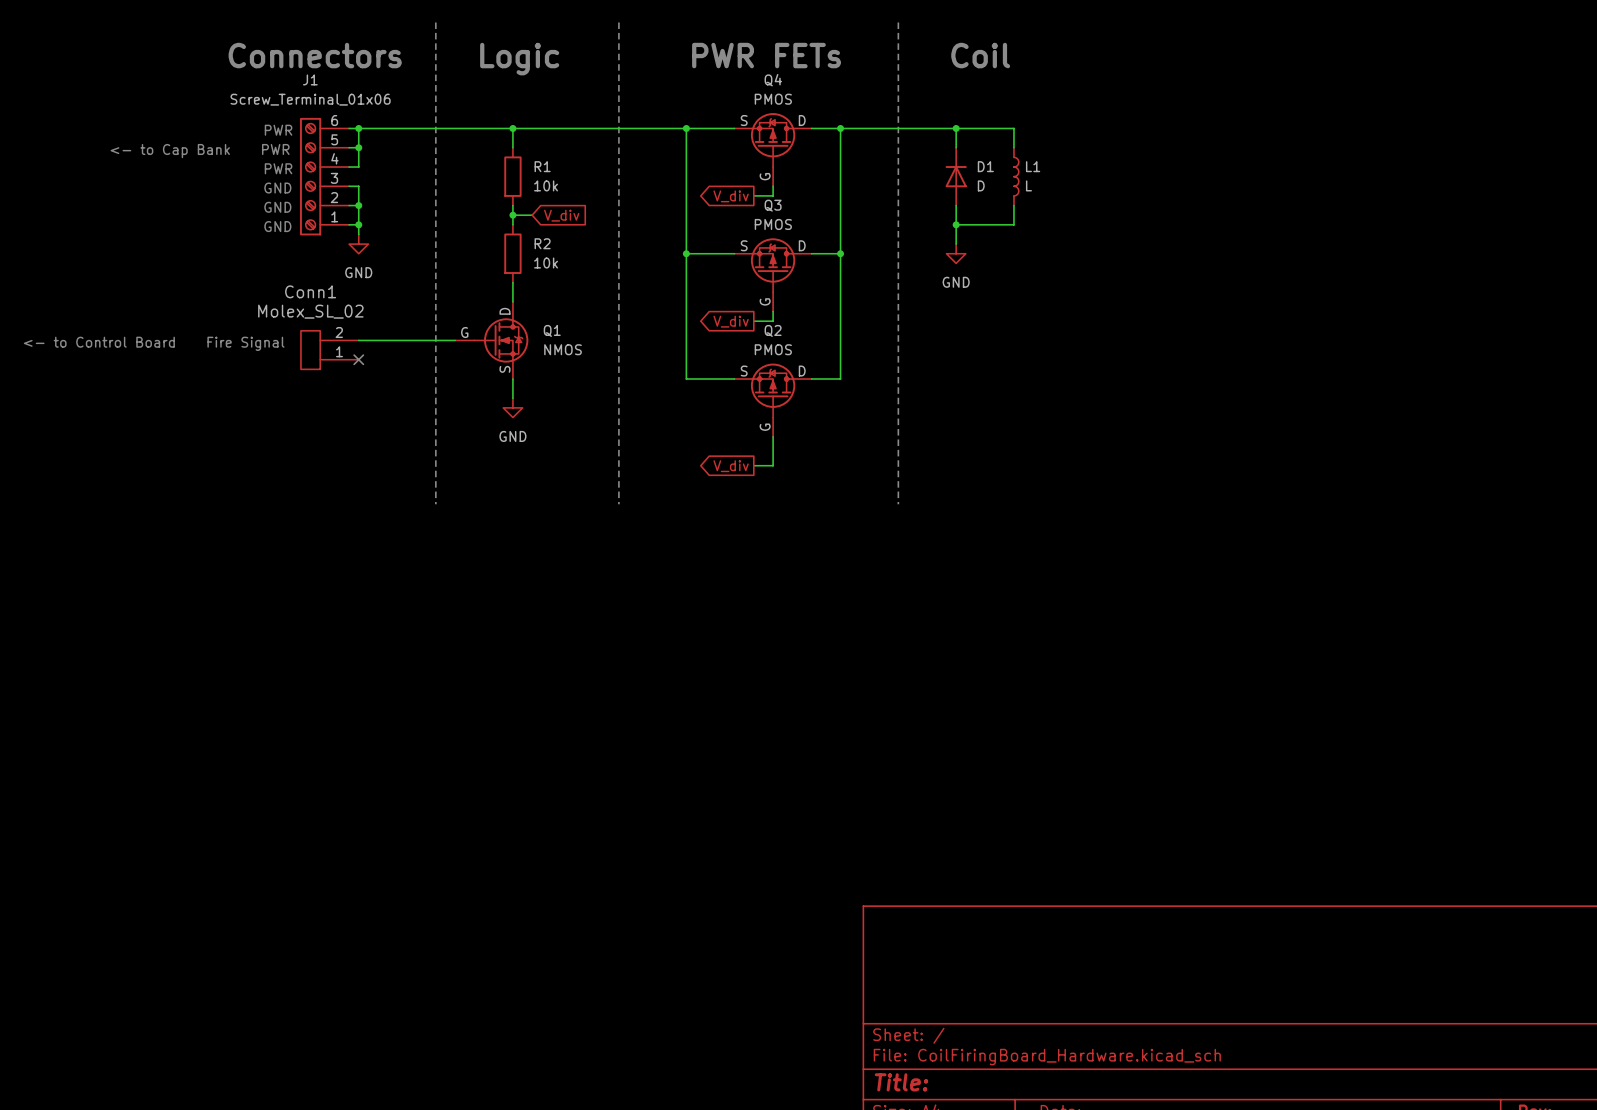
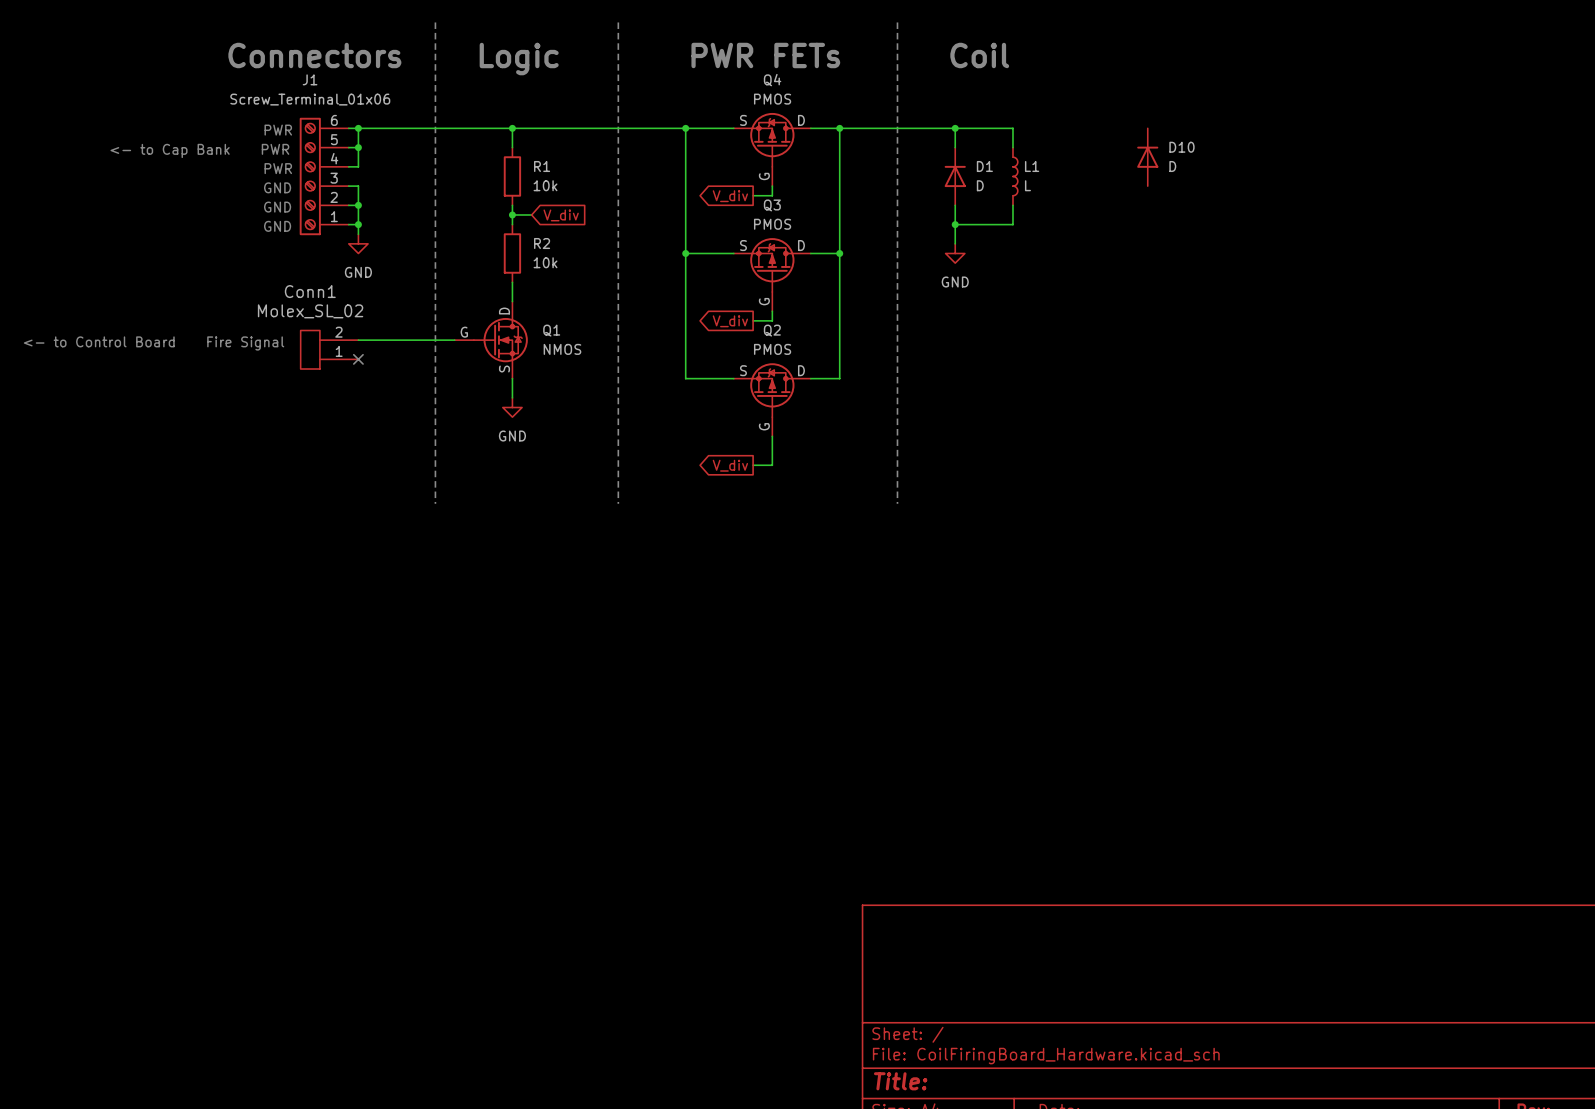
D10: none -> D (1147, 157)

